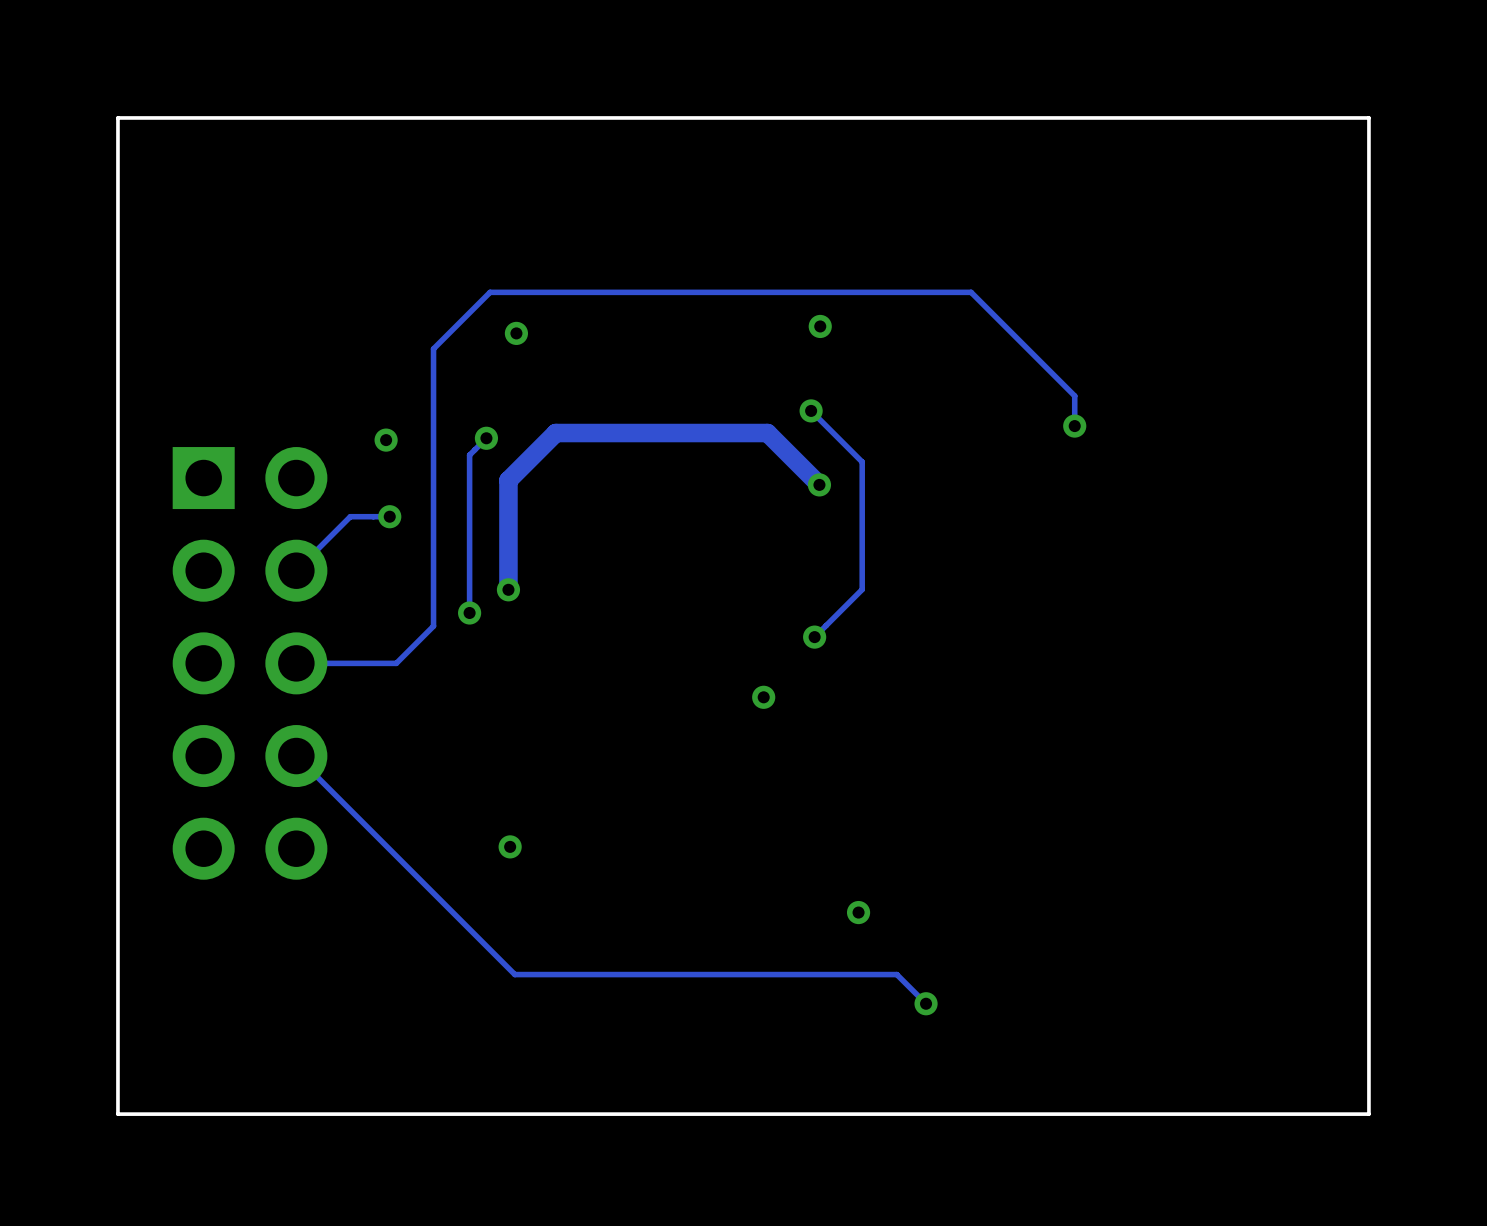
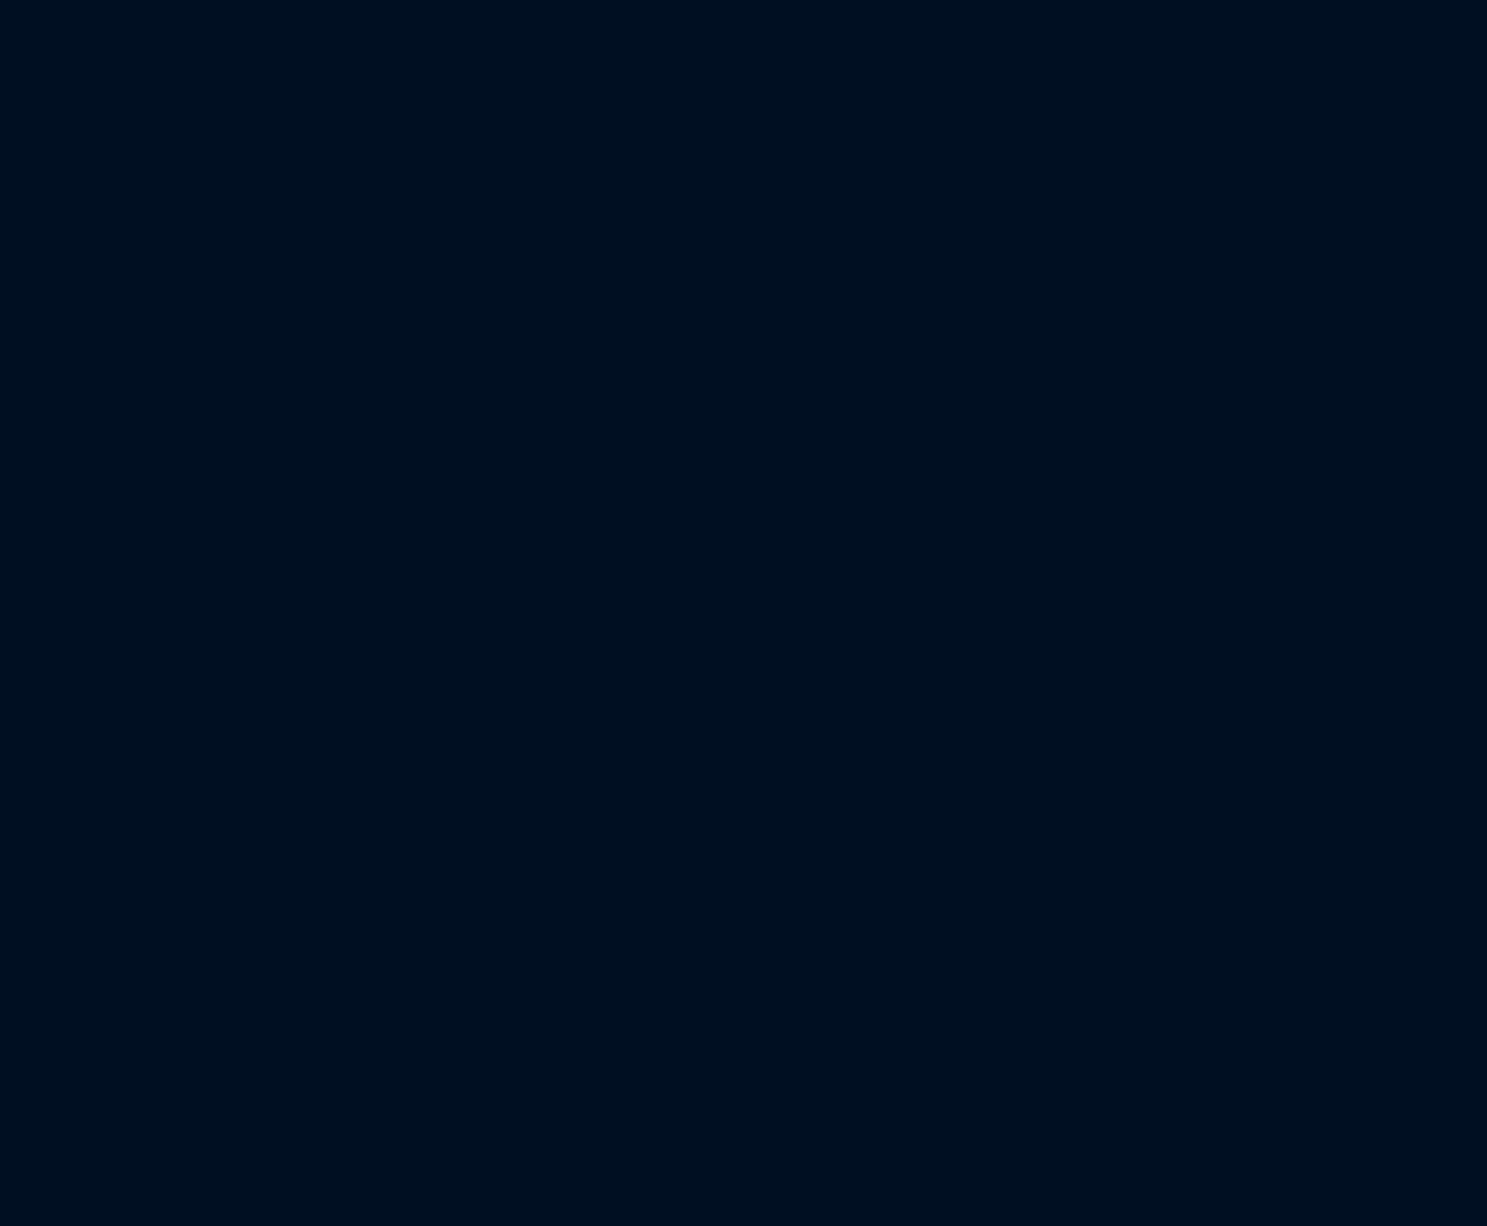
board edge: (1368, 117) (1368, 1114) (117, 1114) (117, 117) (1368, 117) -> none
via: (820, 326) -> none
via: (516, 333) -> none
track: (811, 410) (862, 461) (862, 589) (814, 637) -> none
via: (811, 410) -> none
track: (1074, 426) (1074, 395) (971, 292) (490, 292) (433, 348) (433, 626) (396, 663) (296, 663) -> none
via: (1074, 426) -> none
track: (486, 438) (469, 455) (469, 612) -> none
via: (486, 438) -> none
via: (386, 440) -> none
track: (819, 484) (767, 433) (555, 433) (508, 480) (508, 589) -> none
via: (819, 484) -> none
track: (389, 516) (350, 516) (296, 570) -> none
via: (389, 516) -> none
via: (508, 589) -> none
via: (469, 612) -> none
via: (814, 637) -> none
part: (250, 663) -> none
via: (763, 697) -> none
track: (296, 756) (514, 974) (896, 974) (926, 1003) -> none
via: (510, 846) -> none
via: (858, 912) -> none
via: (926, 1003) -> none

